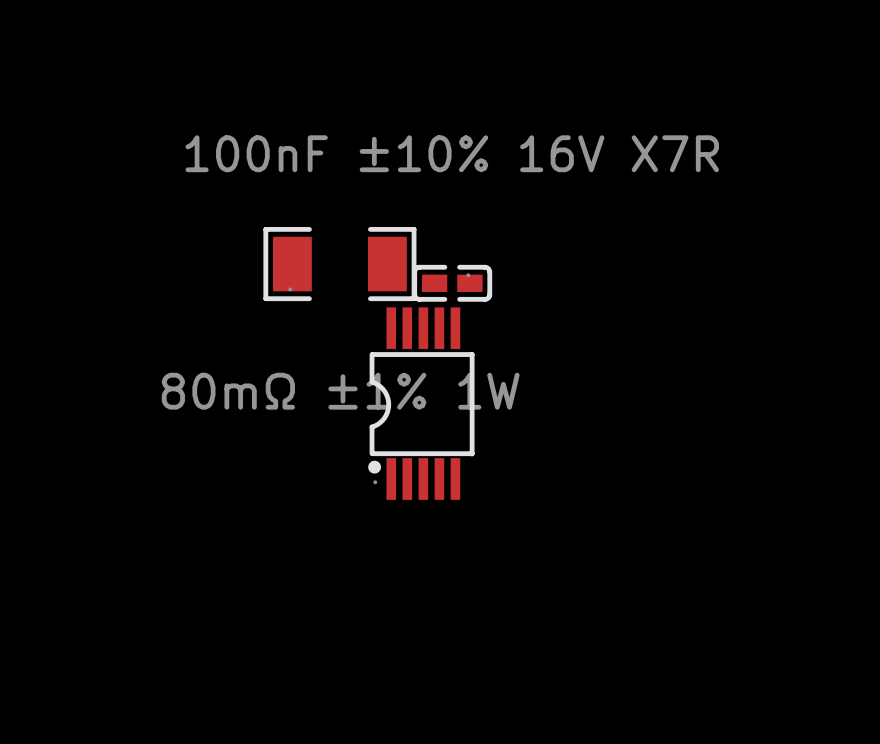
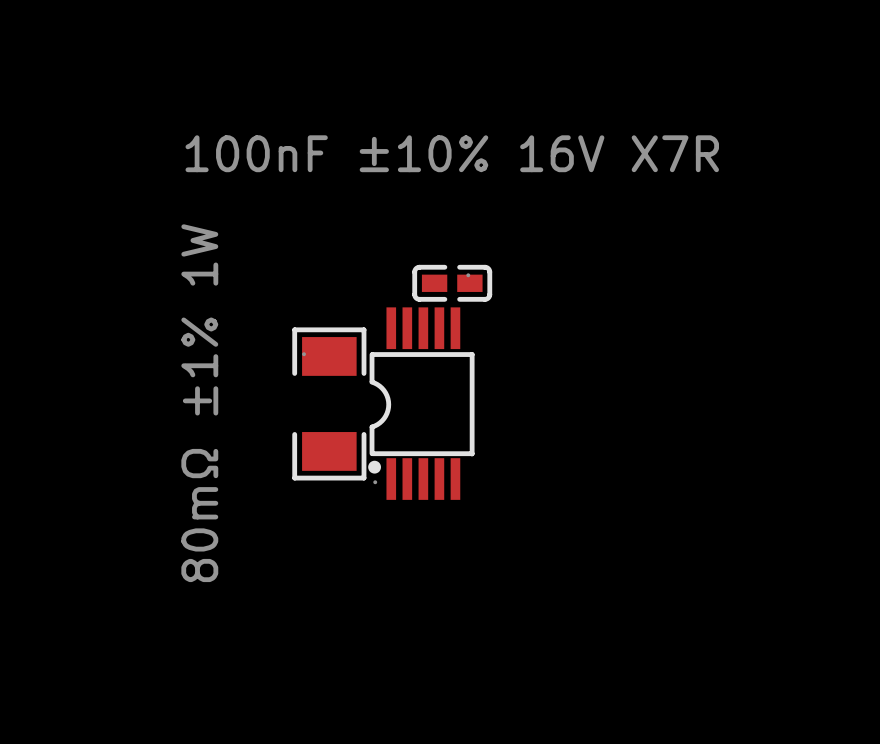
part rotation: 0° (339, 264) -> 90° clockwise (329, 403)
part position: (339, 264) -> (329, 403)

